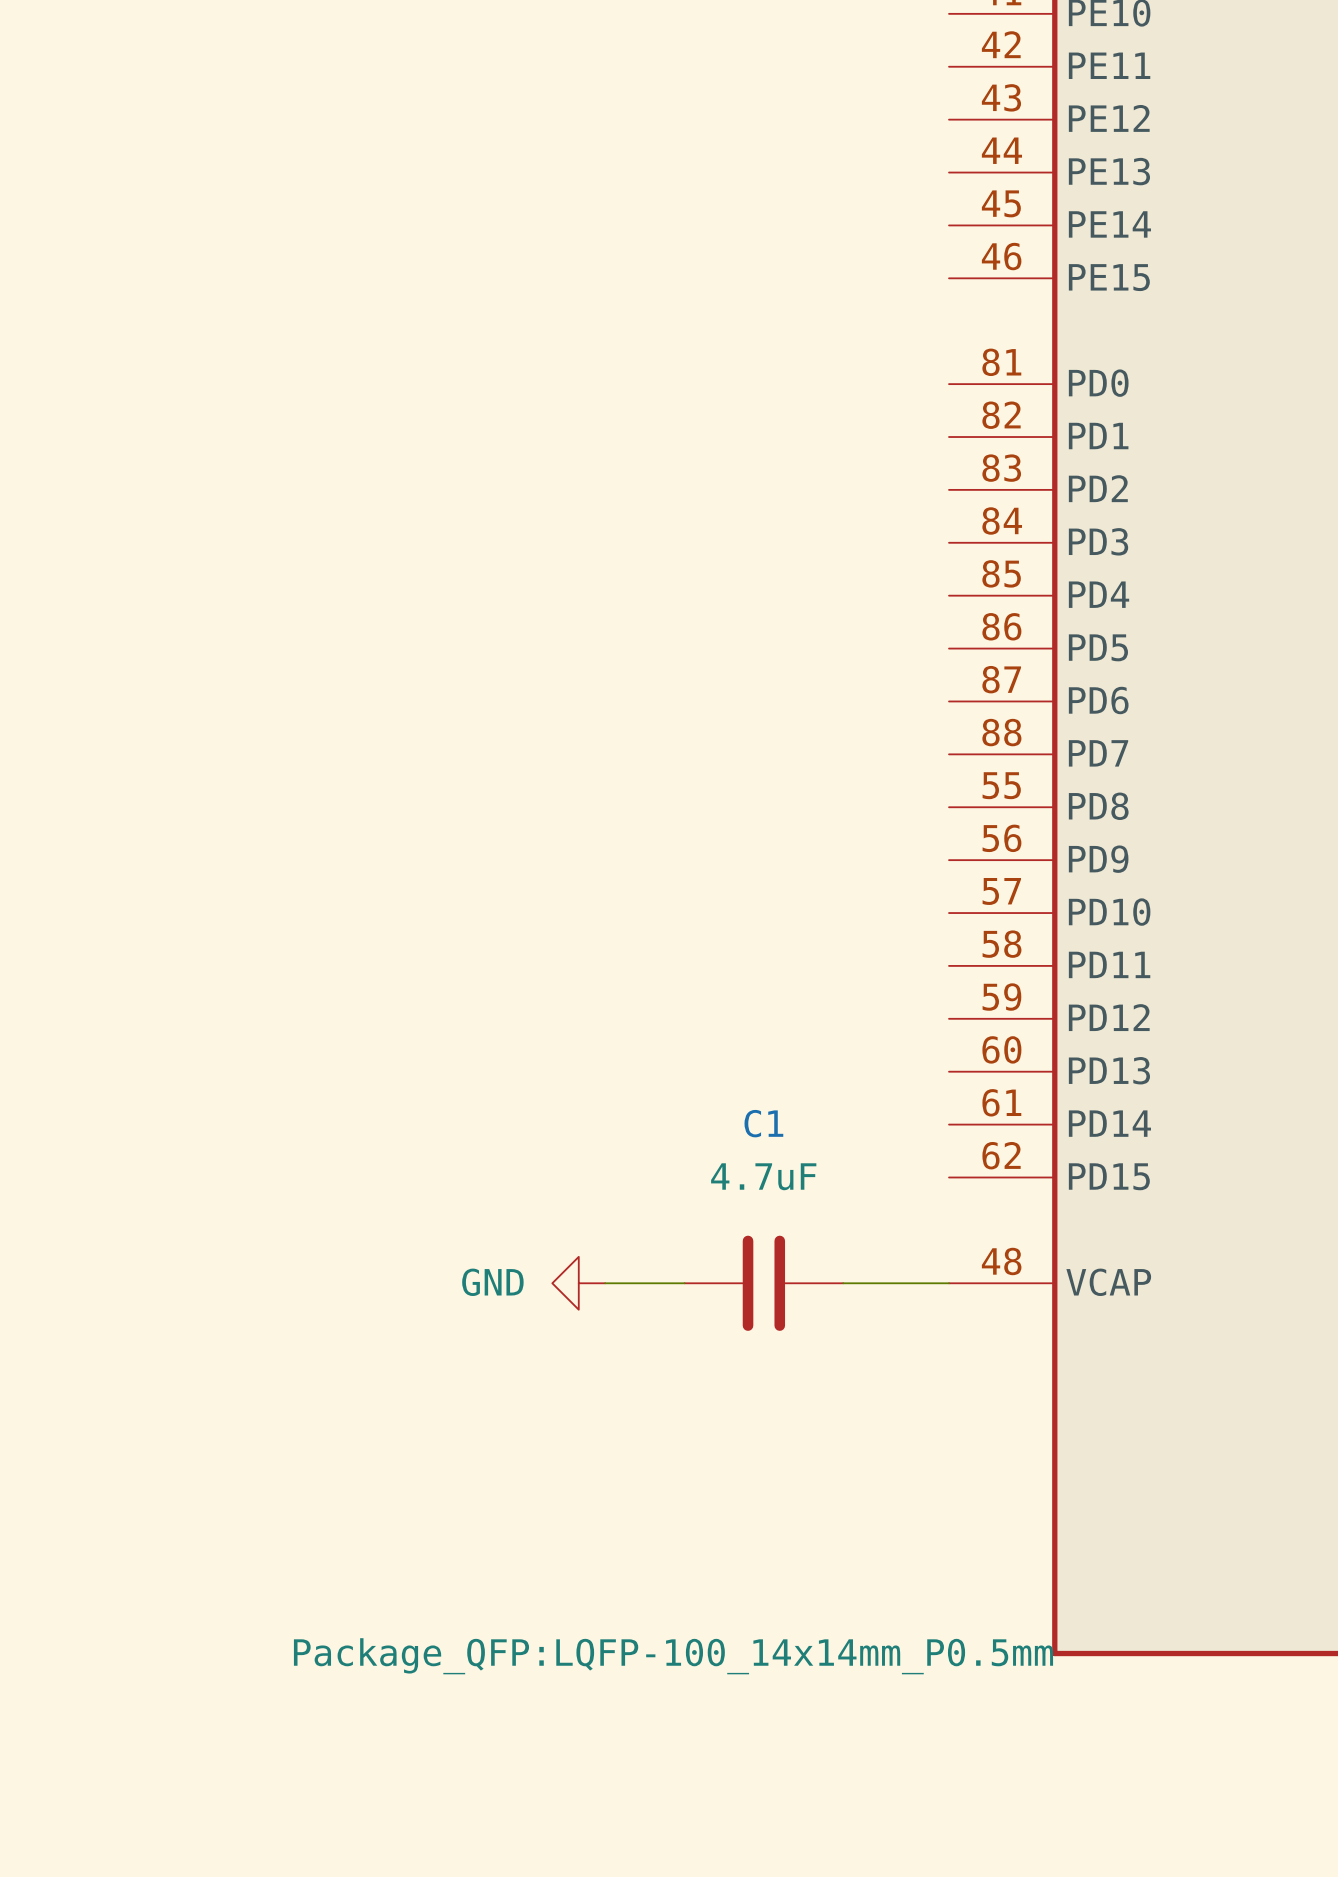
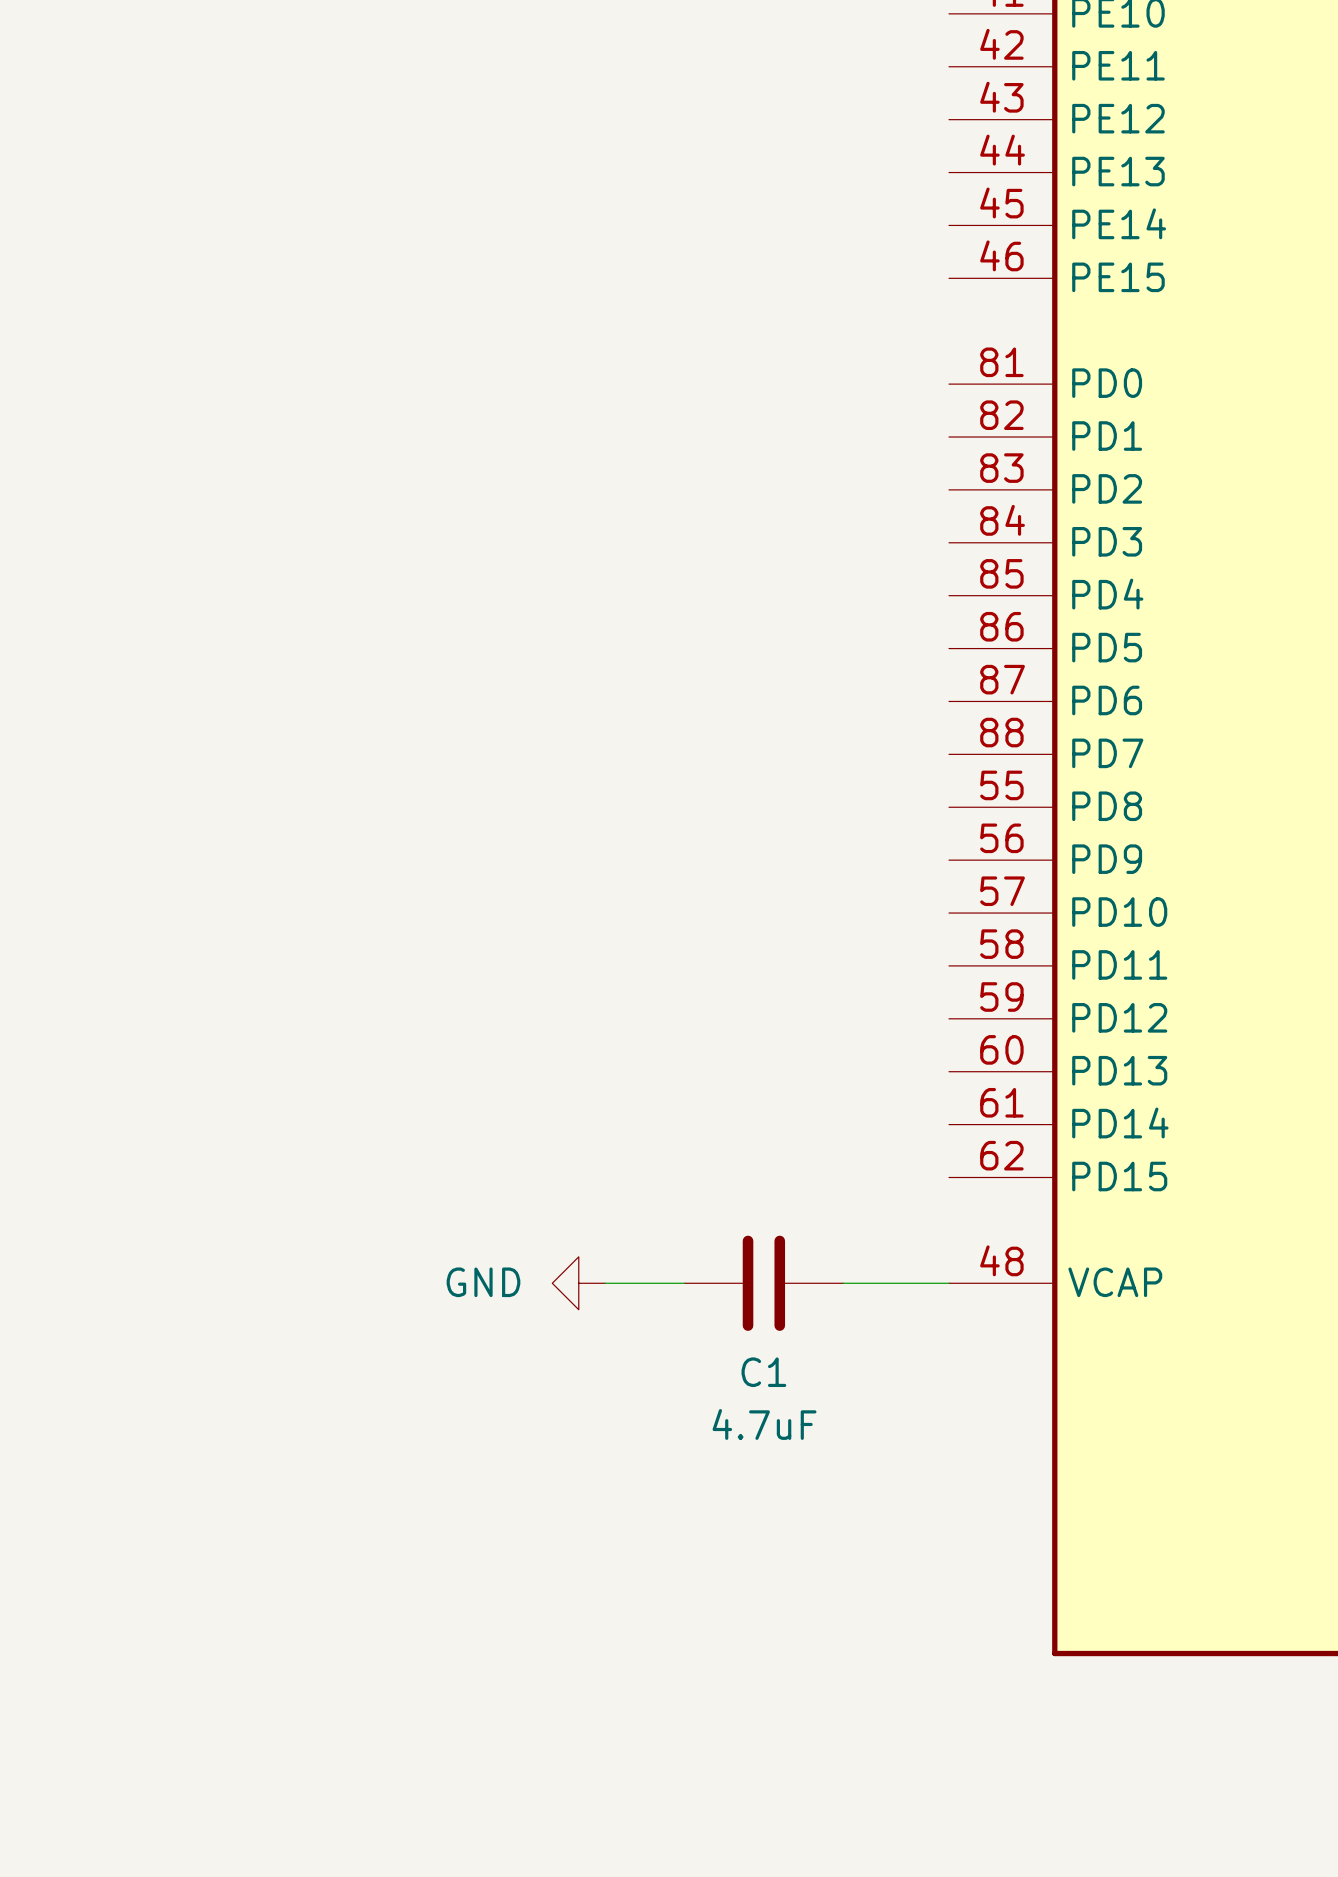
C1 name position: C1 (763, 1123) -> C1 (763, 1372)
C1 value position: 4.7uF (763, 1176) -> 4.7uF (764, 1424)
part text: Package_QFP:LQFP-100_14x14mm_P0.5mm (673, 1656) -> none

